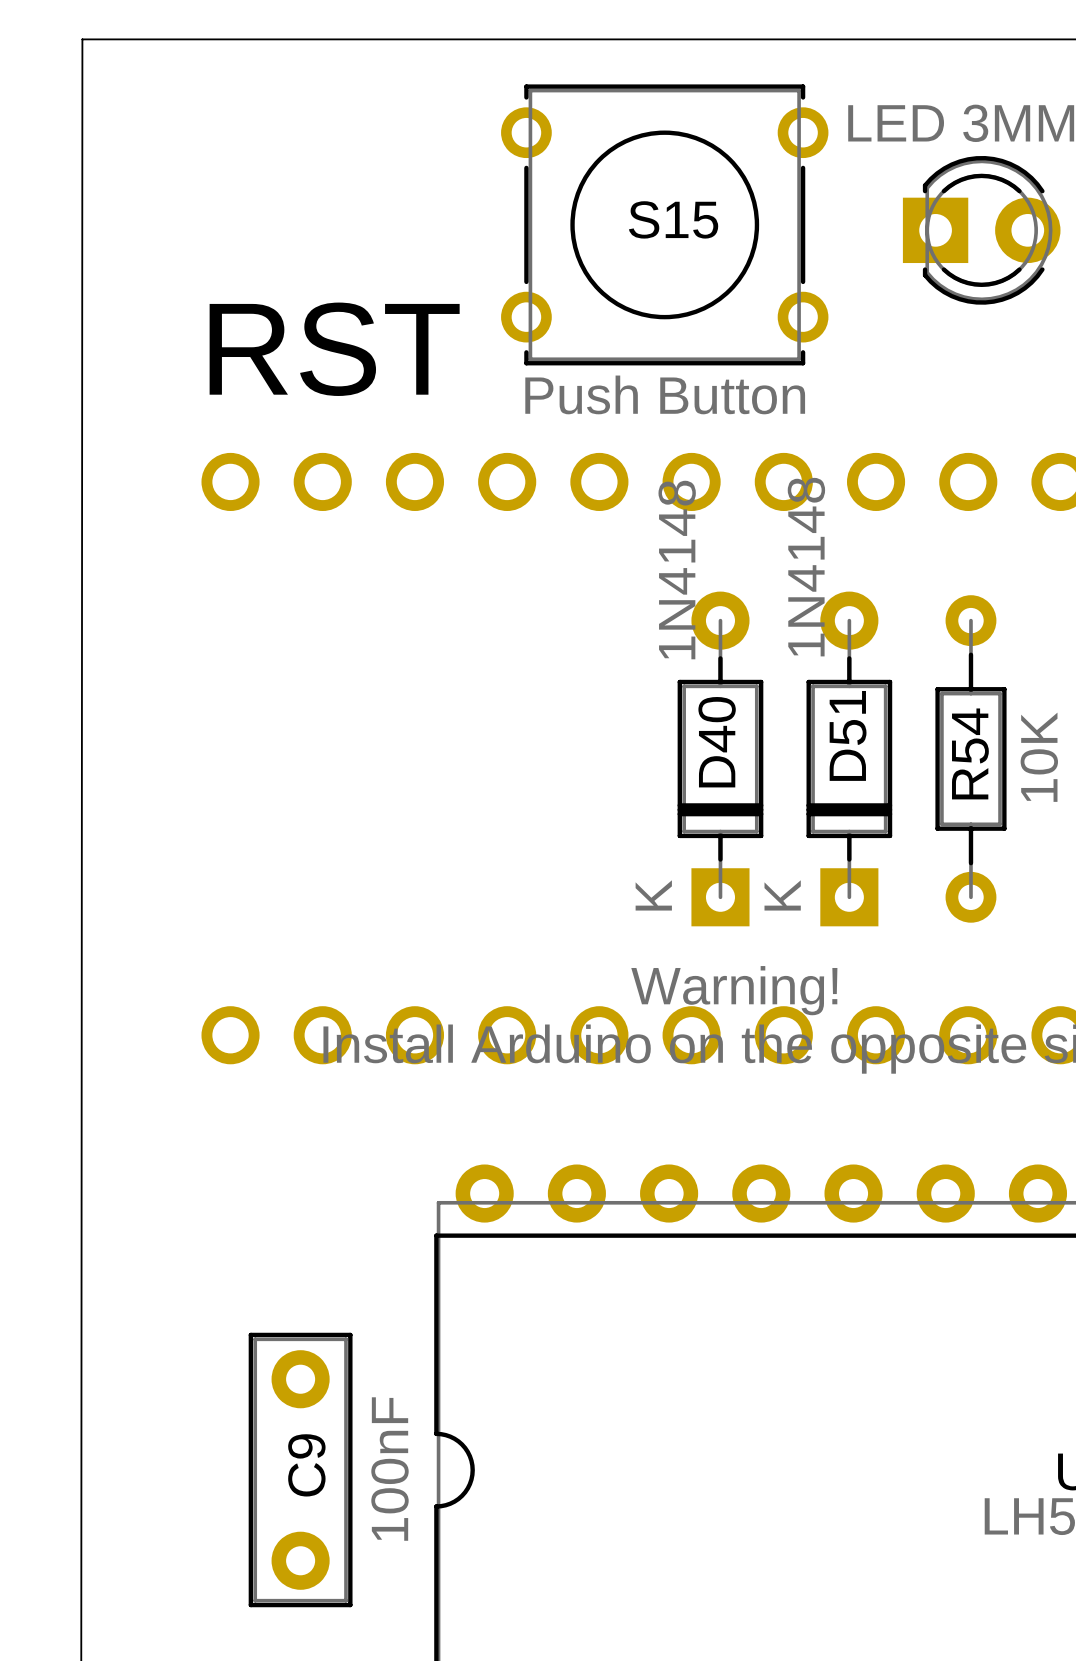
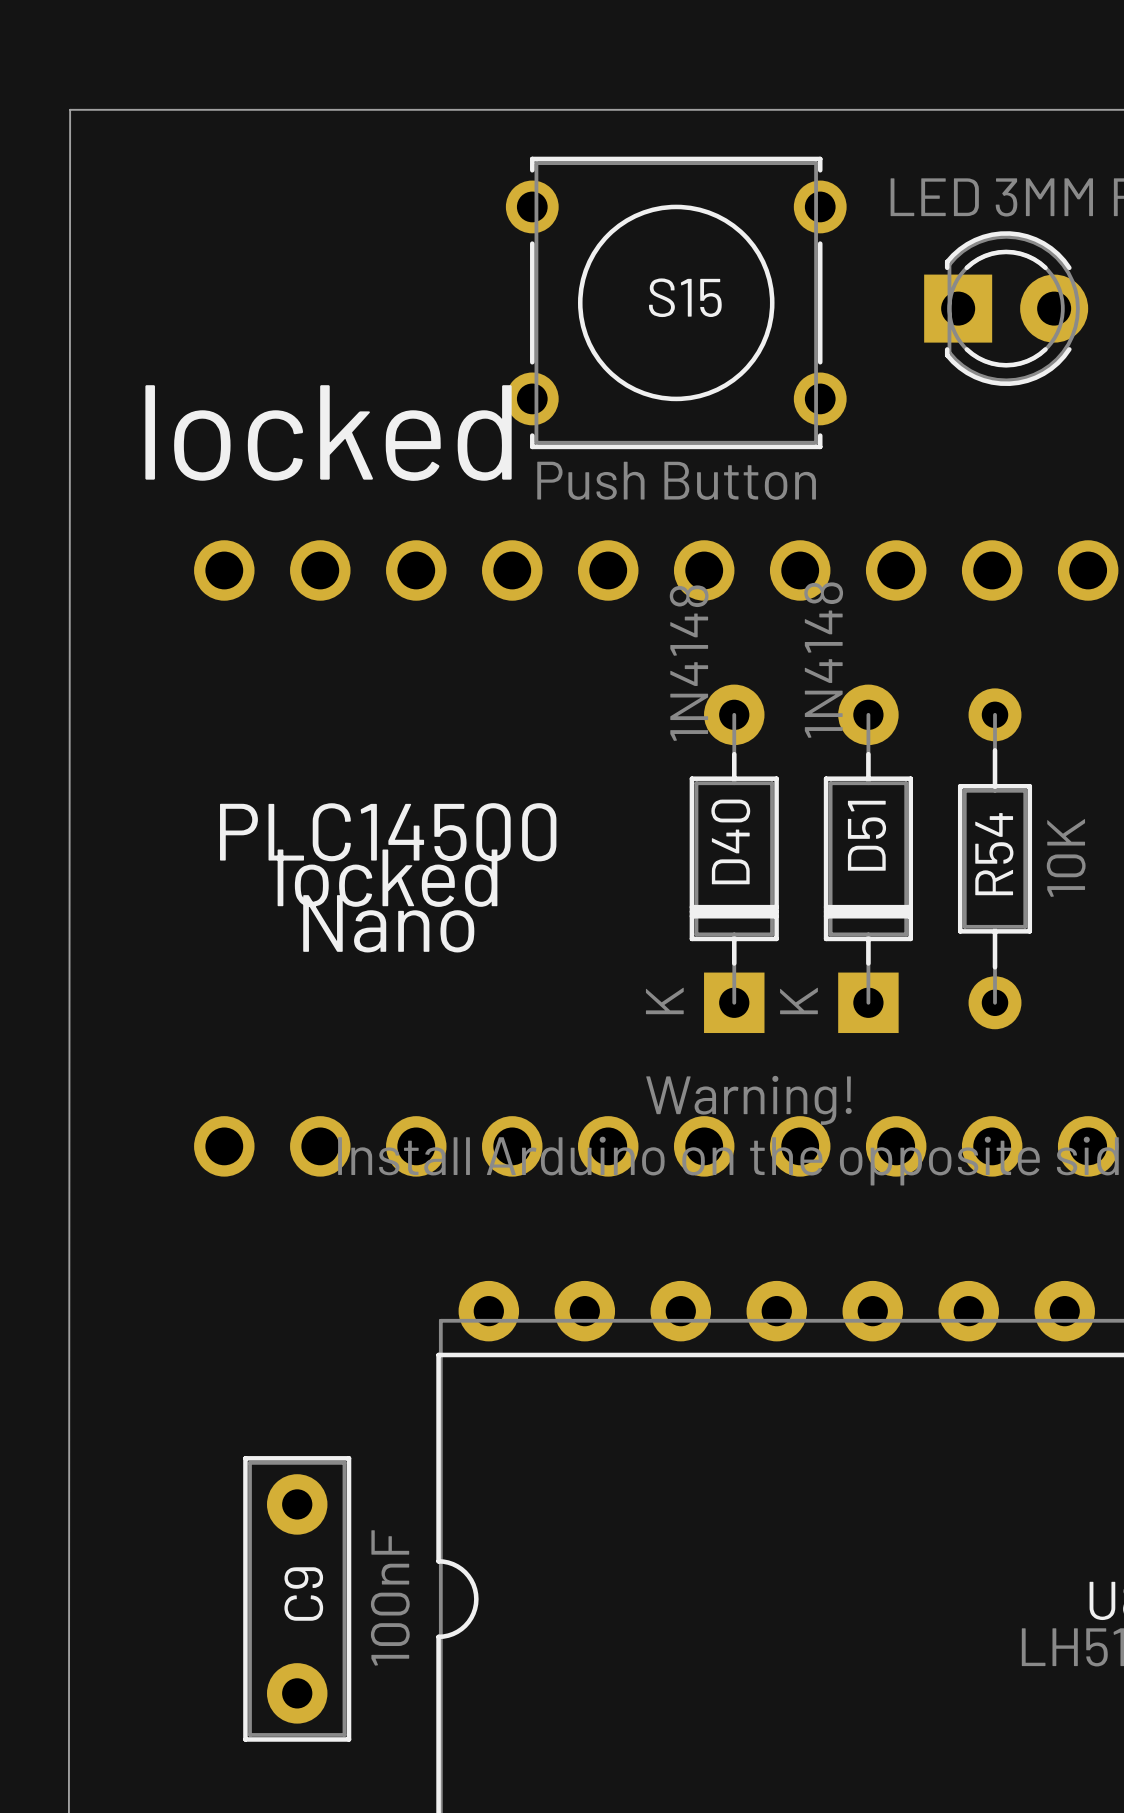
text: RST (334, 349) -> locked (328, 433)
text: none -> PLC14500 (388, 832)
text: none -> locked (387, 878)
text: none -> Nano (388, 923)

